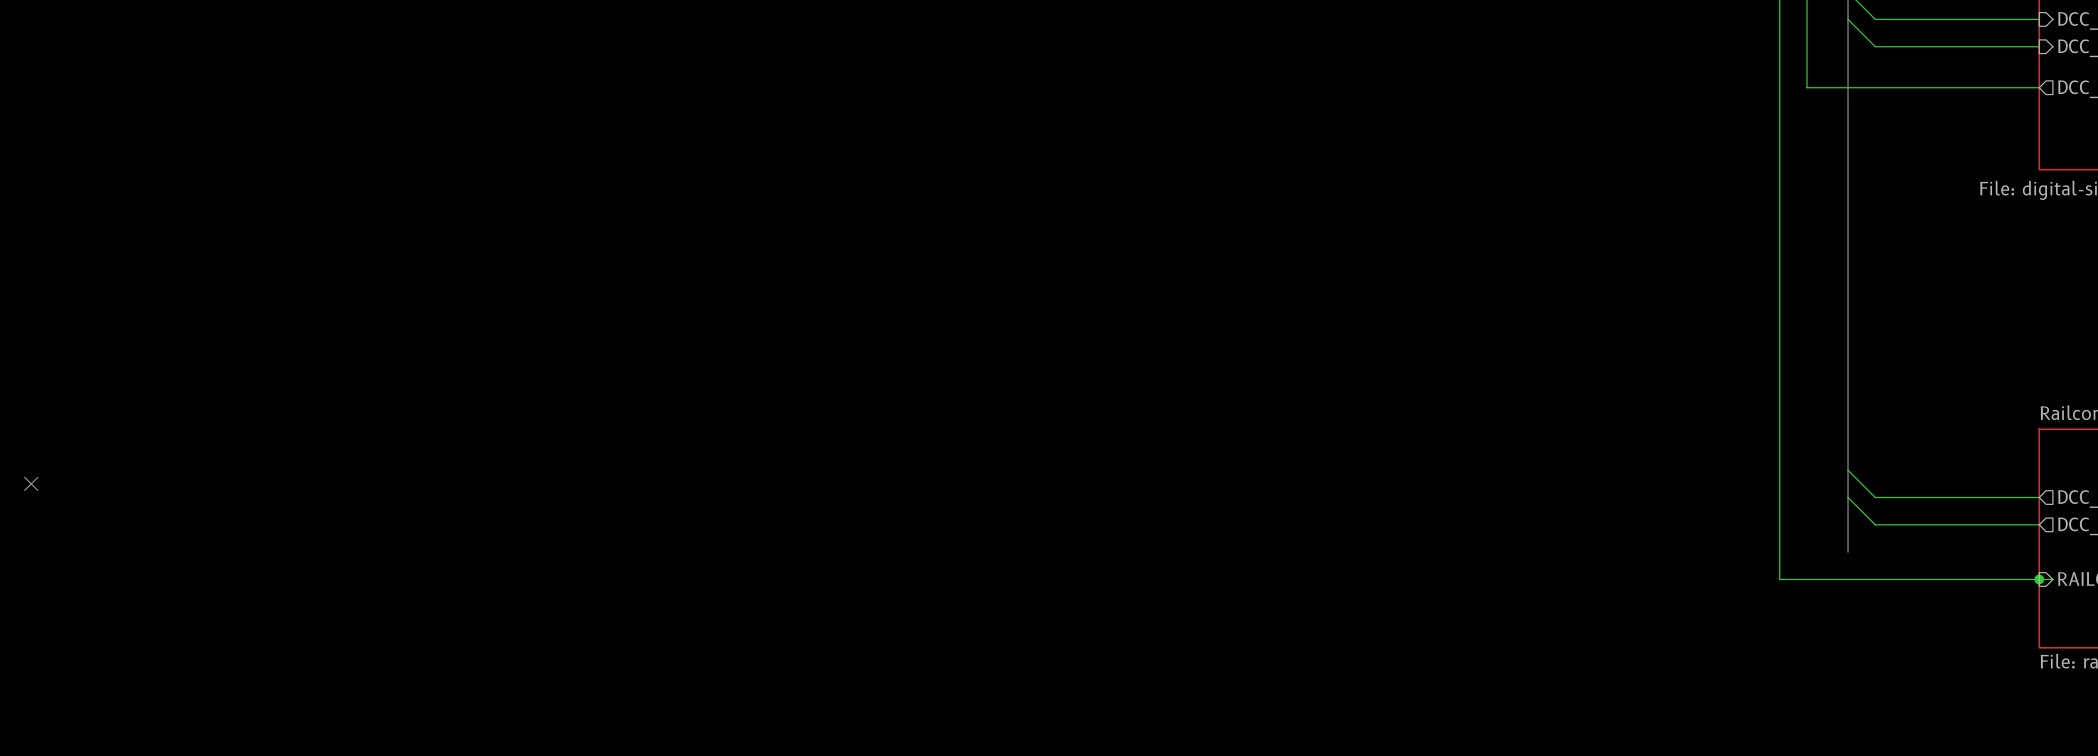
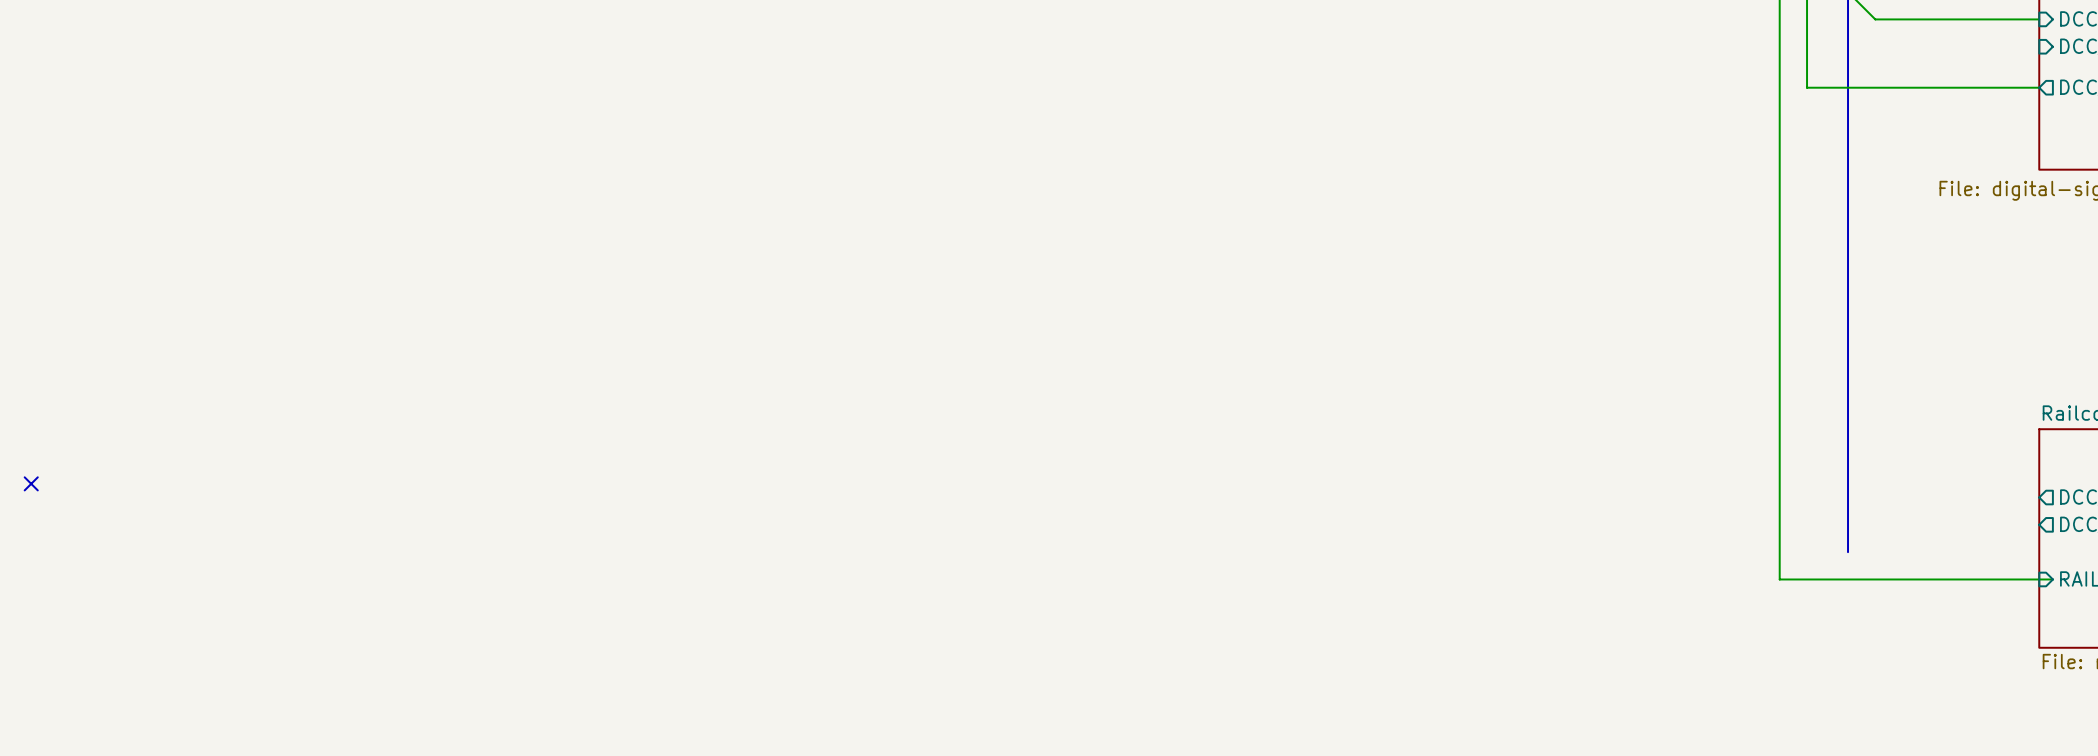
wire: (1848, 19) (1875, 46) (2039, 46) -> none
wire: (1848, 470) (1875, 497) (2039, 497) -> none
wire: (1848, 497) (1875, 524) (2039, 524) -> none
junction: (2039, 579) -> none

